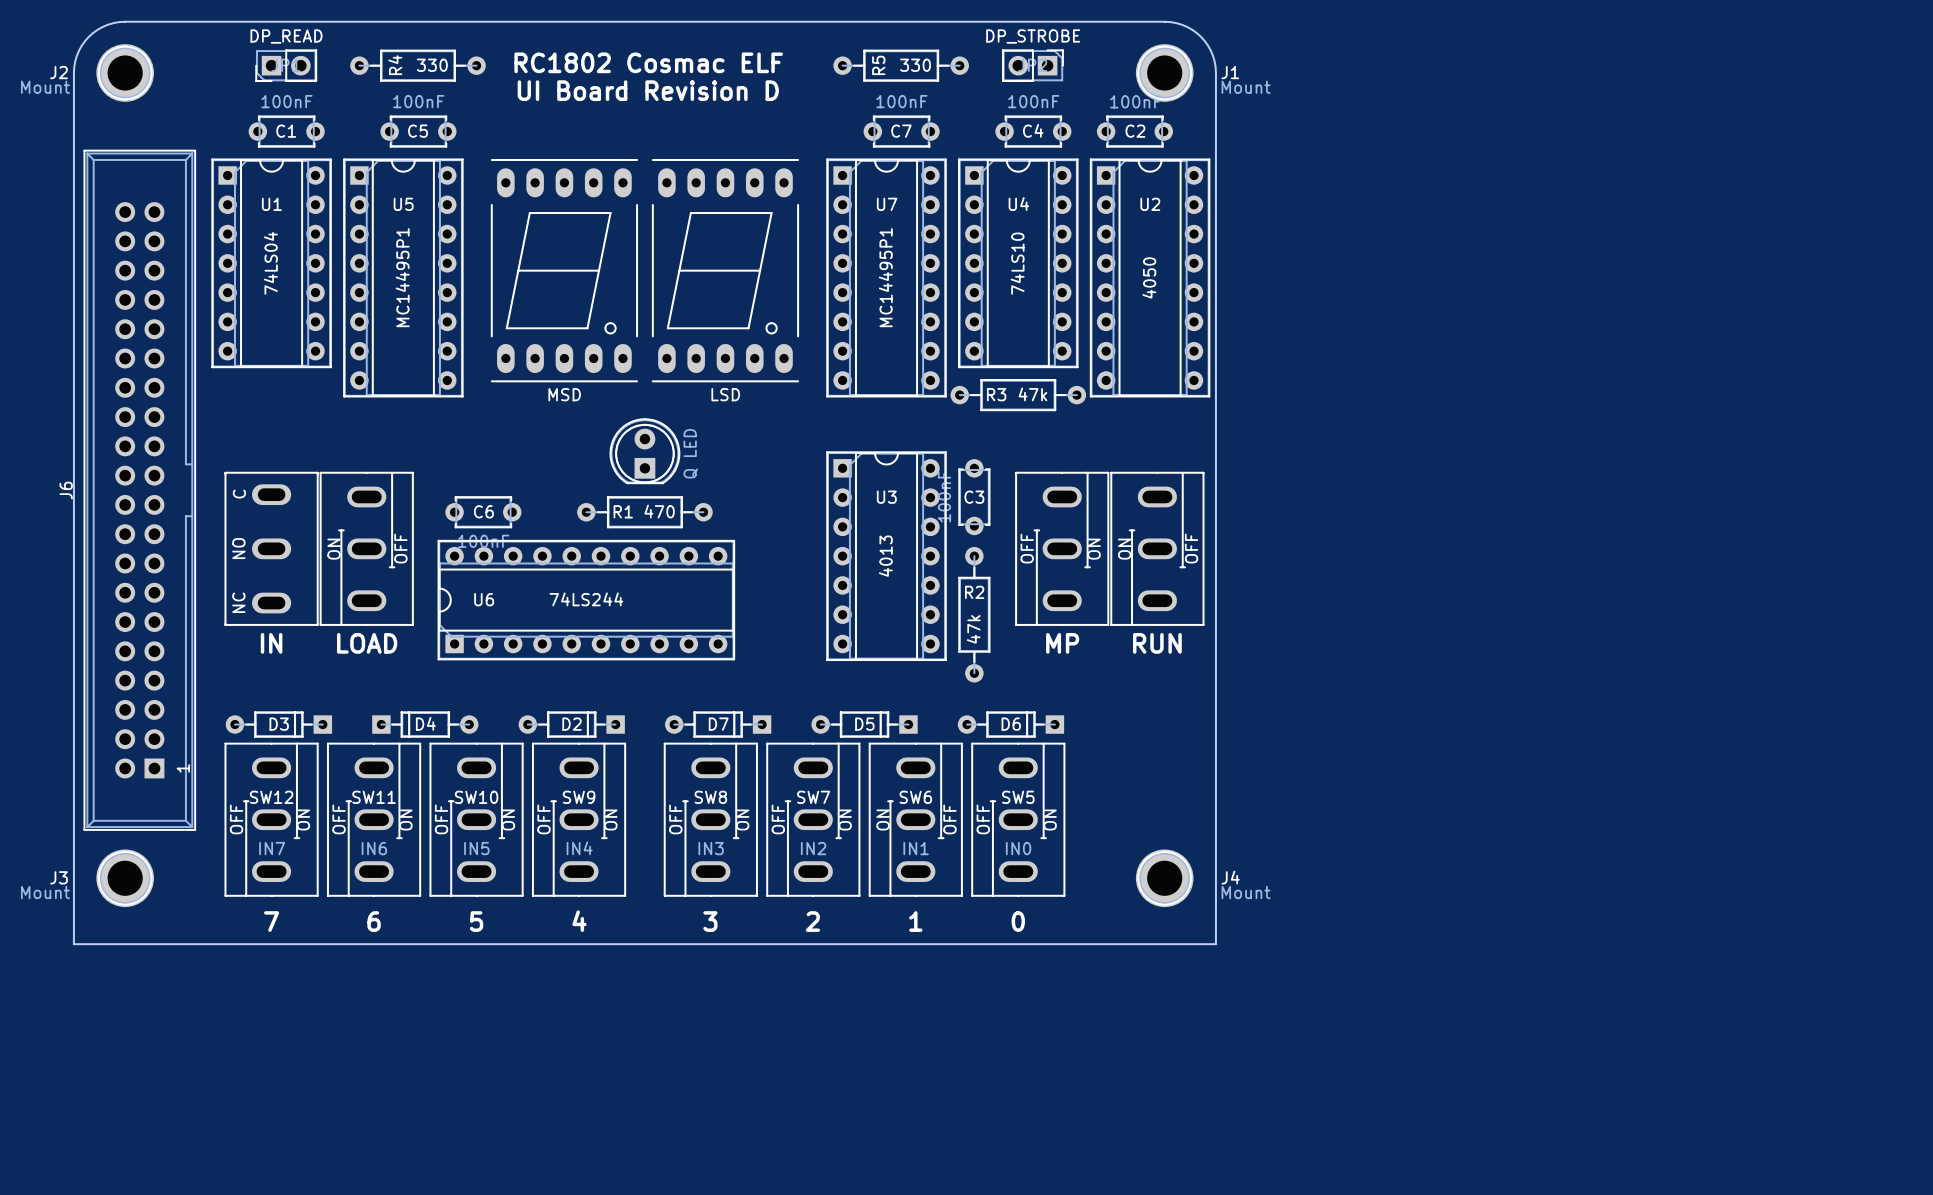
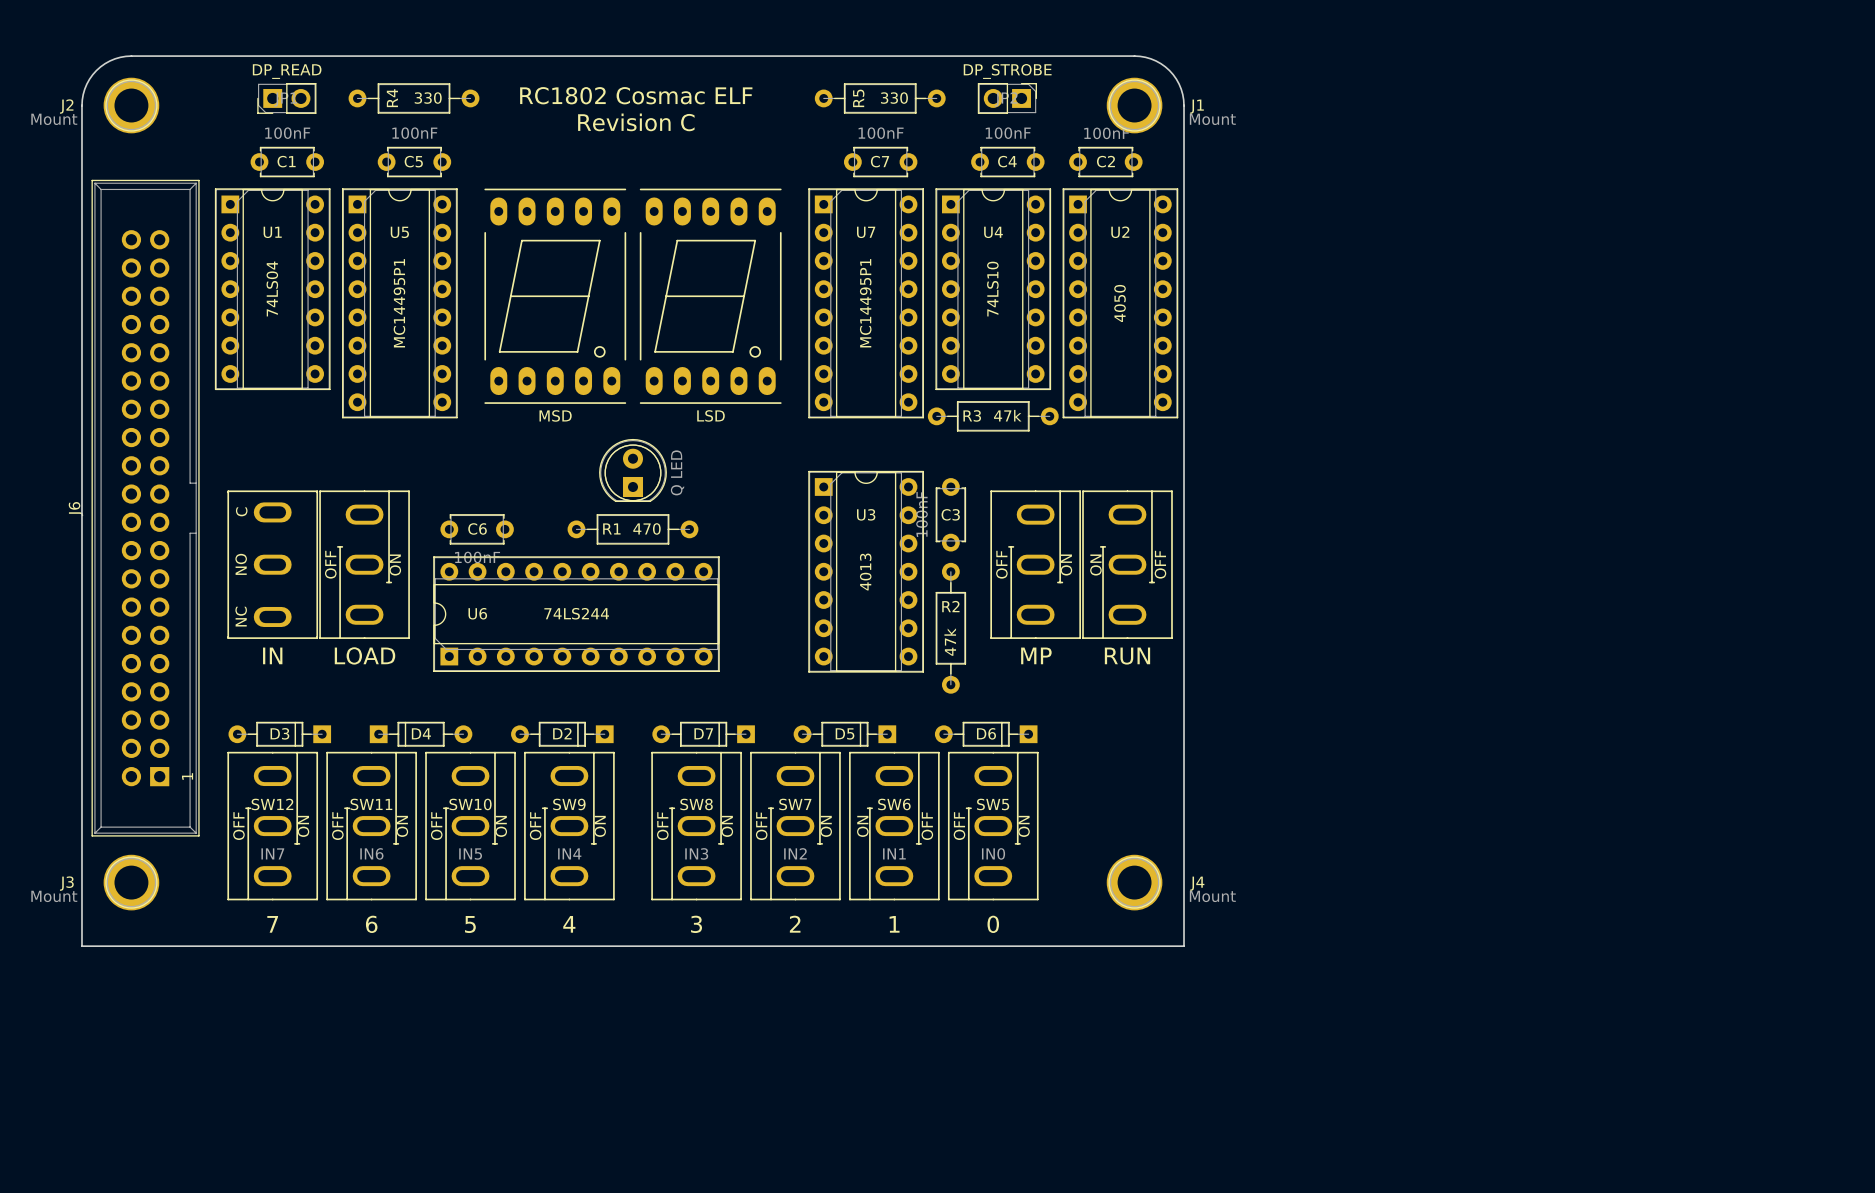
text: UI Board Revision D (648, 90) -> Revision C (636, 122)
part rotation: 0° (366, 548) -> 180° (364, 564)

